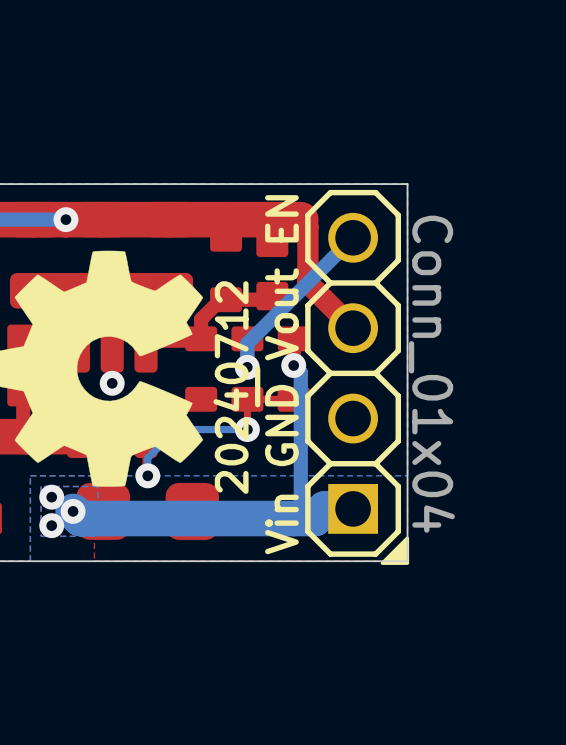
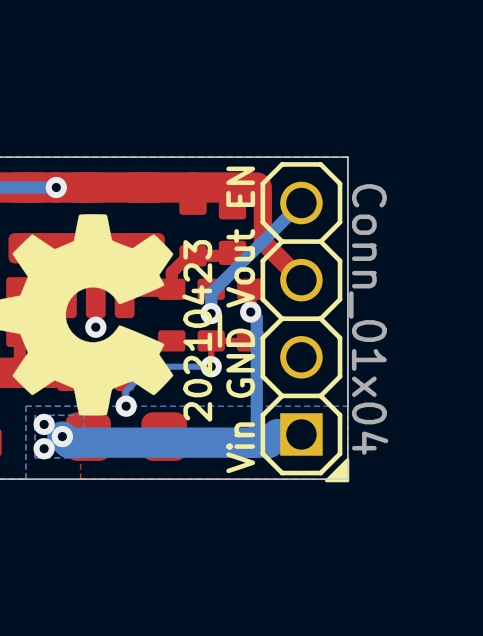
drawing shape: [213, 281, 261, 494] -> [182, 240, 223, 422]

